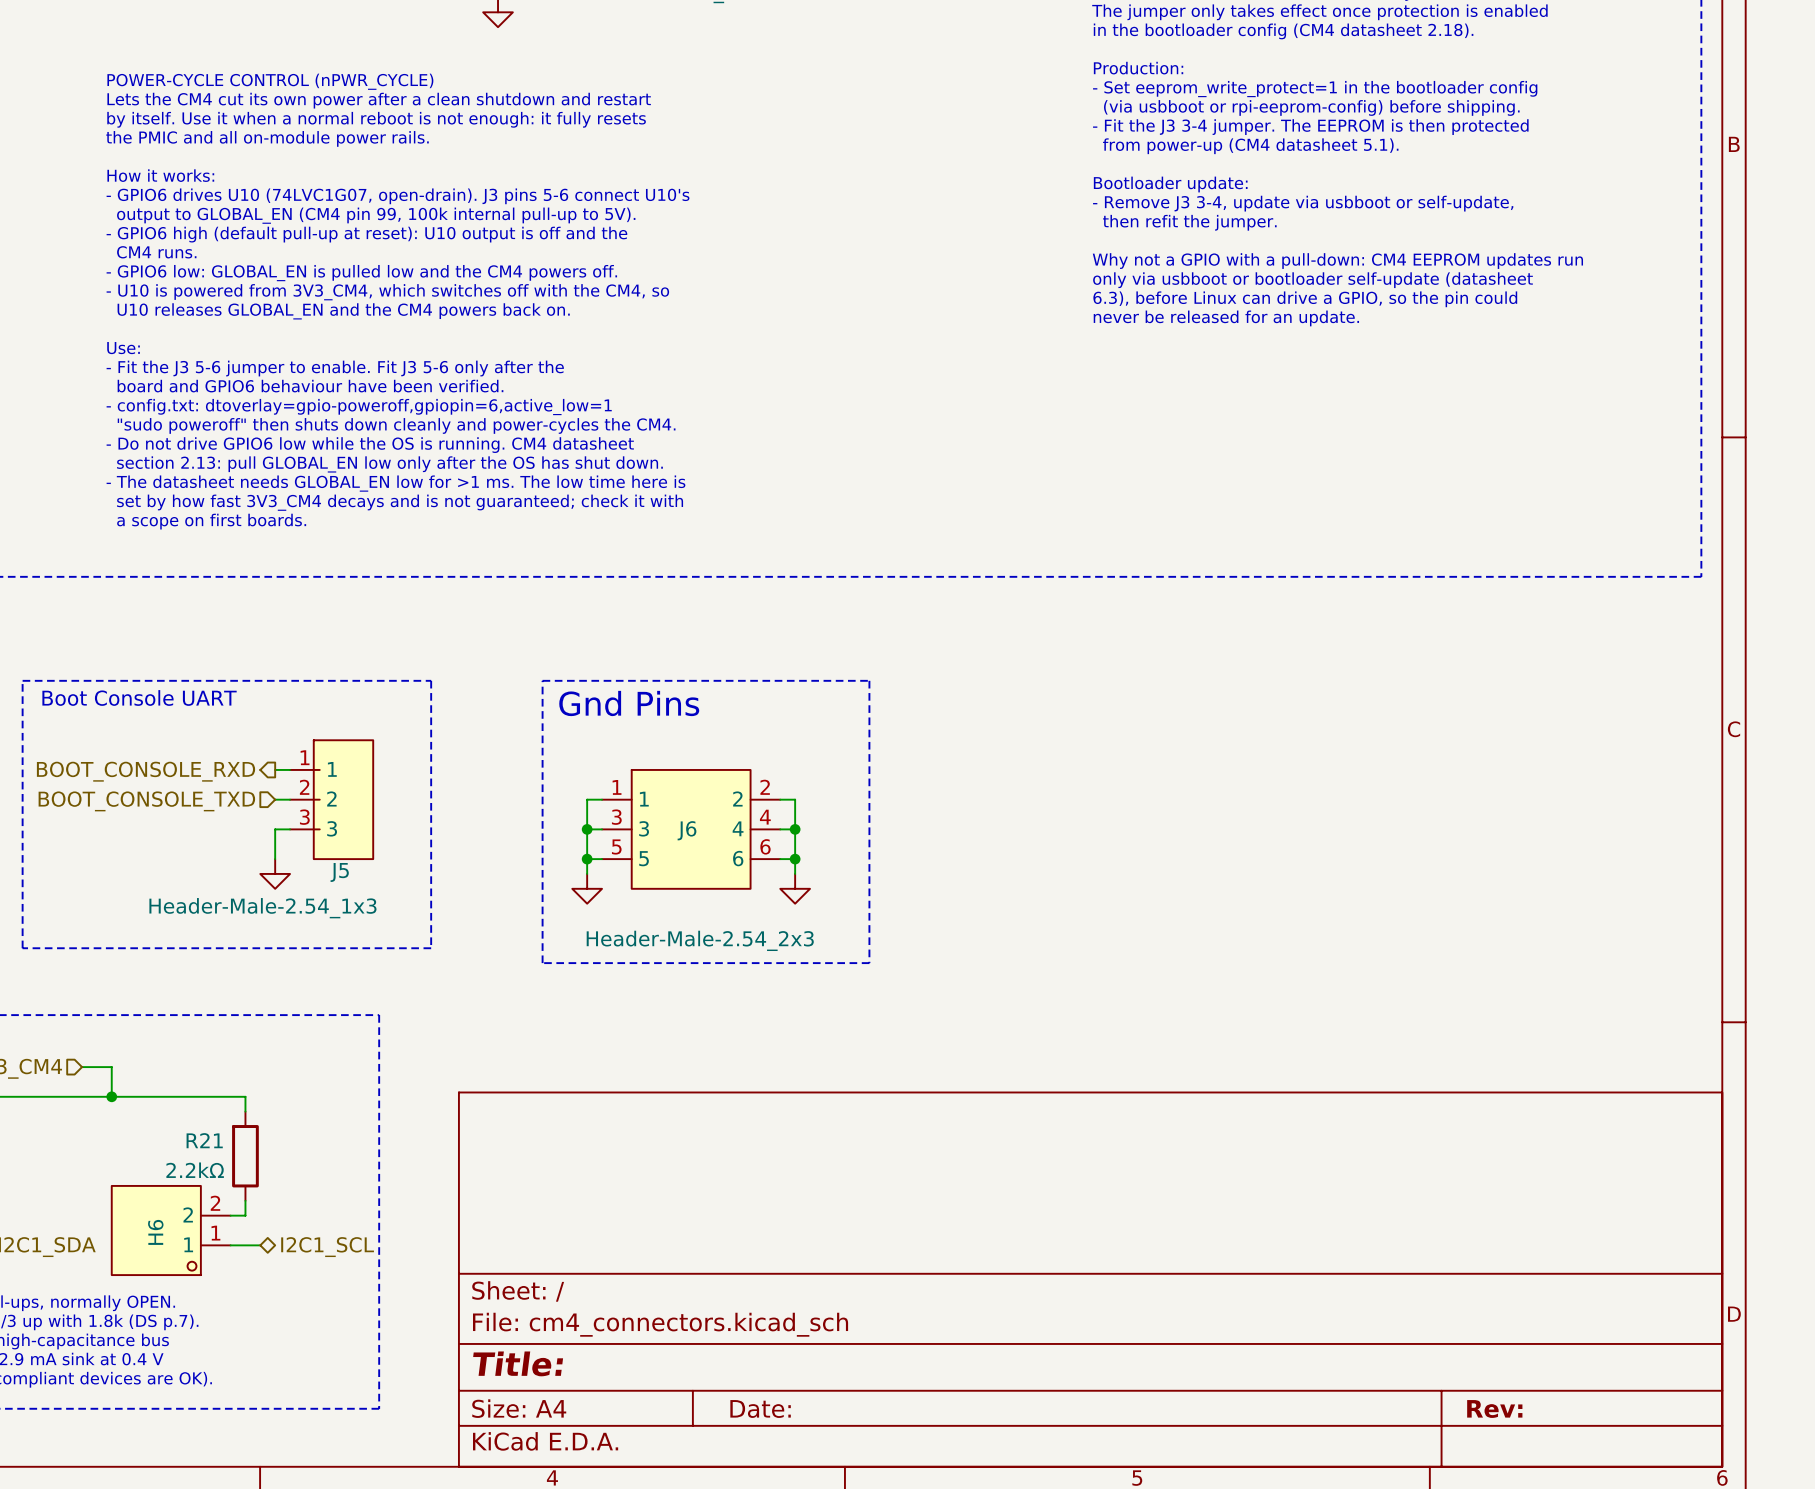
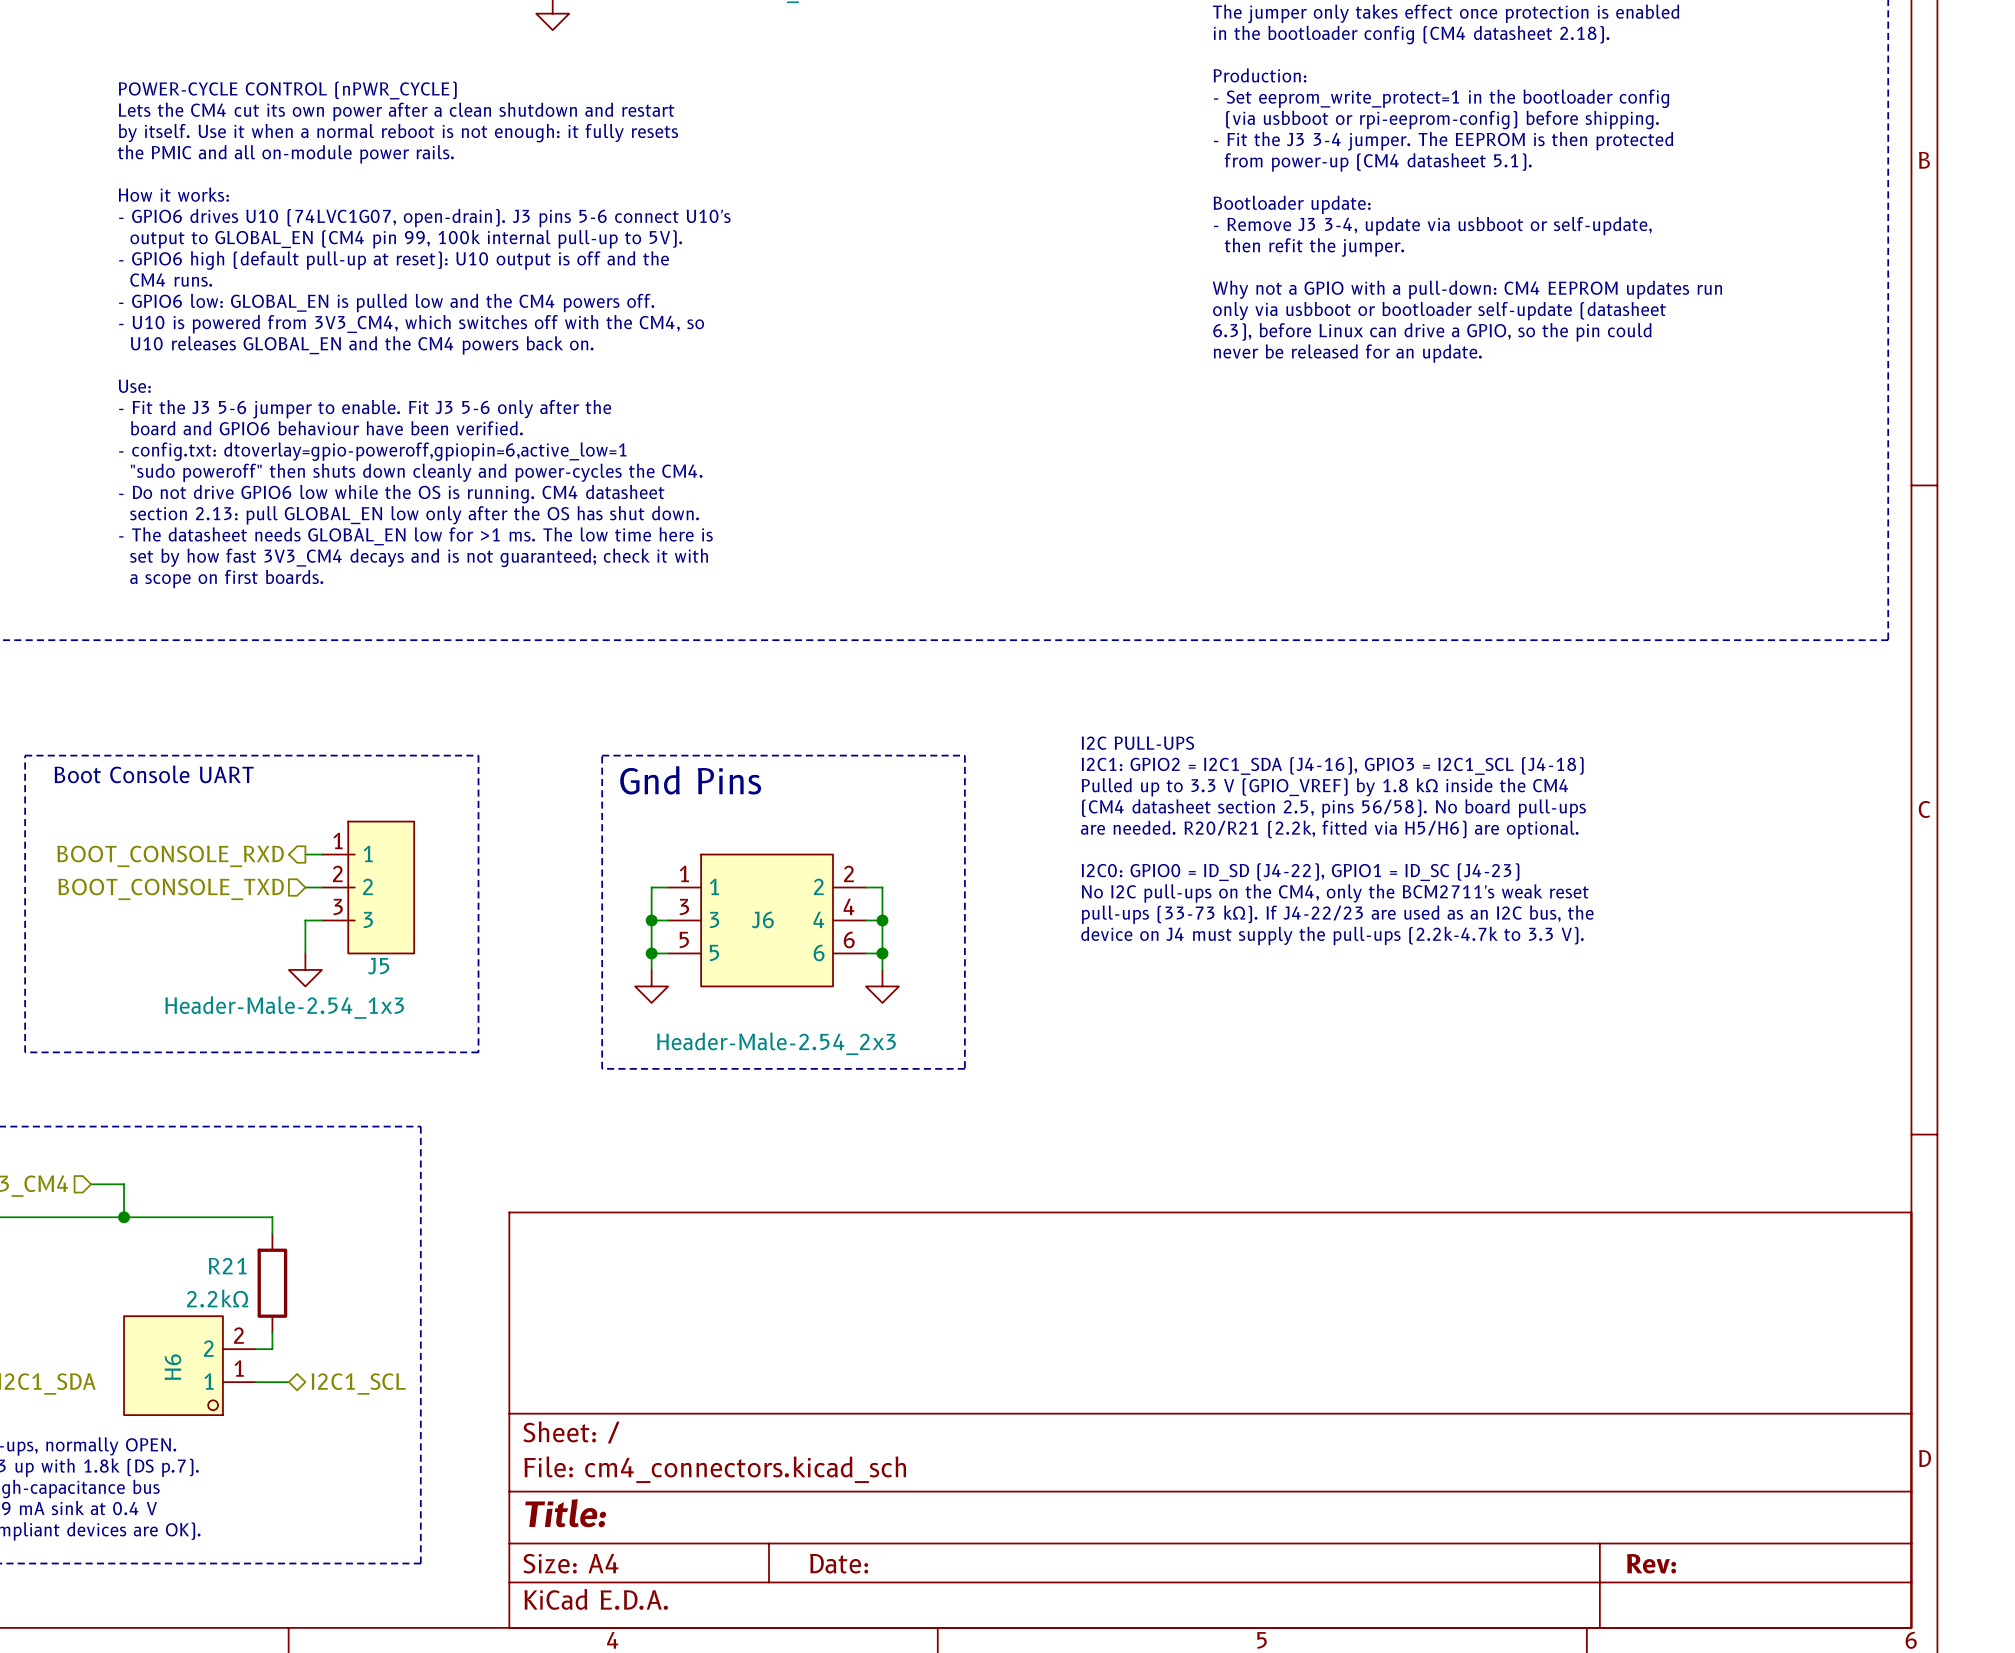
text: none -> I2C PULL-UPS (1137, 743)
text: none -> I2C1: GPIO2 = I2C1_SDA (J4-16), GPIO3 = I2C1_SCL (J4-18) (1332, 765)
text: none -> Pulled up to 3.3 V (GPIO_VREF) by 1.8 kΩ inside the CM4 (1324, 787)
text: none -> (CM4 datasheet section 2.5, pins 56/58). No board pull-ups (1333, 808)
text: none -> are needed. R20/R21 (2.2k, fitted via H5/H6) are optional. (1329, 829)
text: none -> I2C0: GPIO0 = ID_SD (J4-22), GPIO1 = ID_SC (J4-23) (1300, 872)
text: none -> No I2C pull-ups on the CM4, only the BCM2711's weak reset (1335, 893)
text: none -> pull-ups (33-73 kΩ). If J4-22/23 are used as an I2C bus, the (1337, 914)
text: none -> device on J4 must supply the pull-ups (2.2k-4.7k to 3.3 V). (1332, 935)

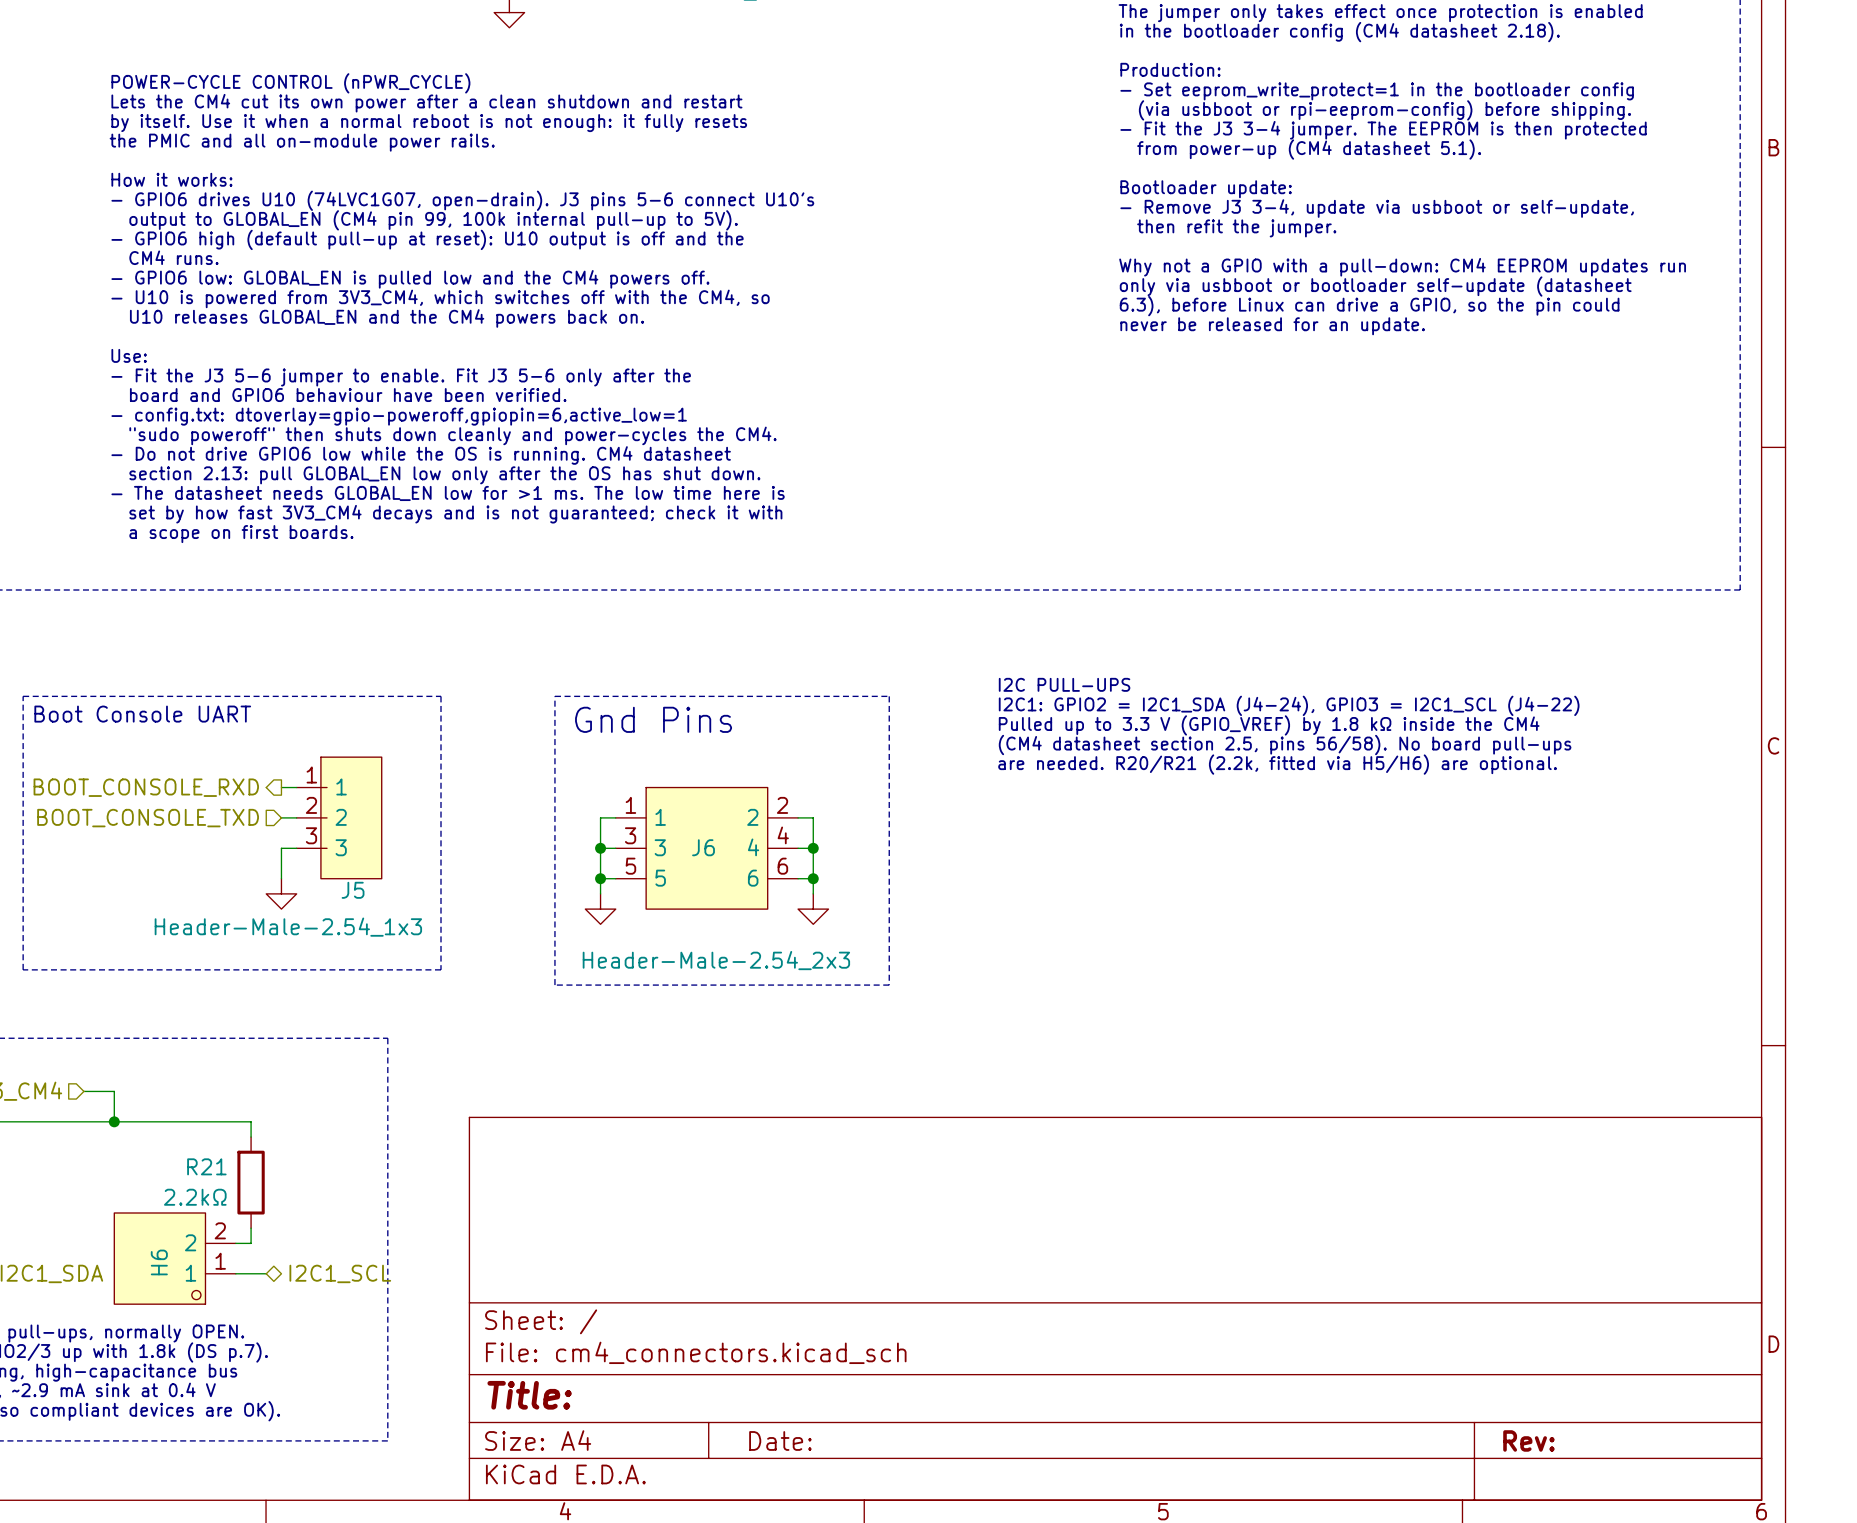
text: I2C1: GPIO2 = I2C1_SDA (J4-16), GPIO3 = I2C1_SCL (J4-18) (1332, 765) -> I2C1: GPIO2 = I2C1_SDA (J4-24), GPIO3 = I2C1_SCL (J4-22) (1289, 705)
text: I2C0: GPIO0 = ID_SD (J4-22), GPIO1 = ID_SC (J4-23) (1300, 872) -> none
text: No I2C pull-ups on the CM4, only the BCM2711's weak reset (1335, 893) -> none
text: pull-ups (33-73 kΩ). If J4-22/23 are used as an I2C bus, the (1337, 914) -> none
text: device on J4 must supply the pull-ups (2.2k-4.7k to 3.3 V). (1332, 935) -> none

